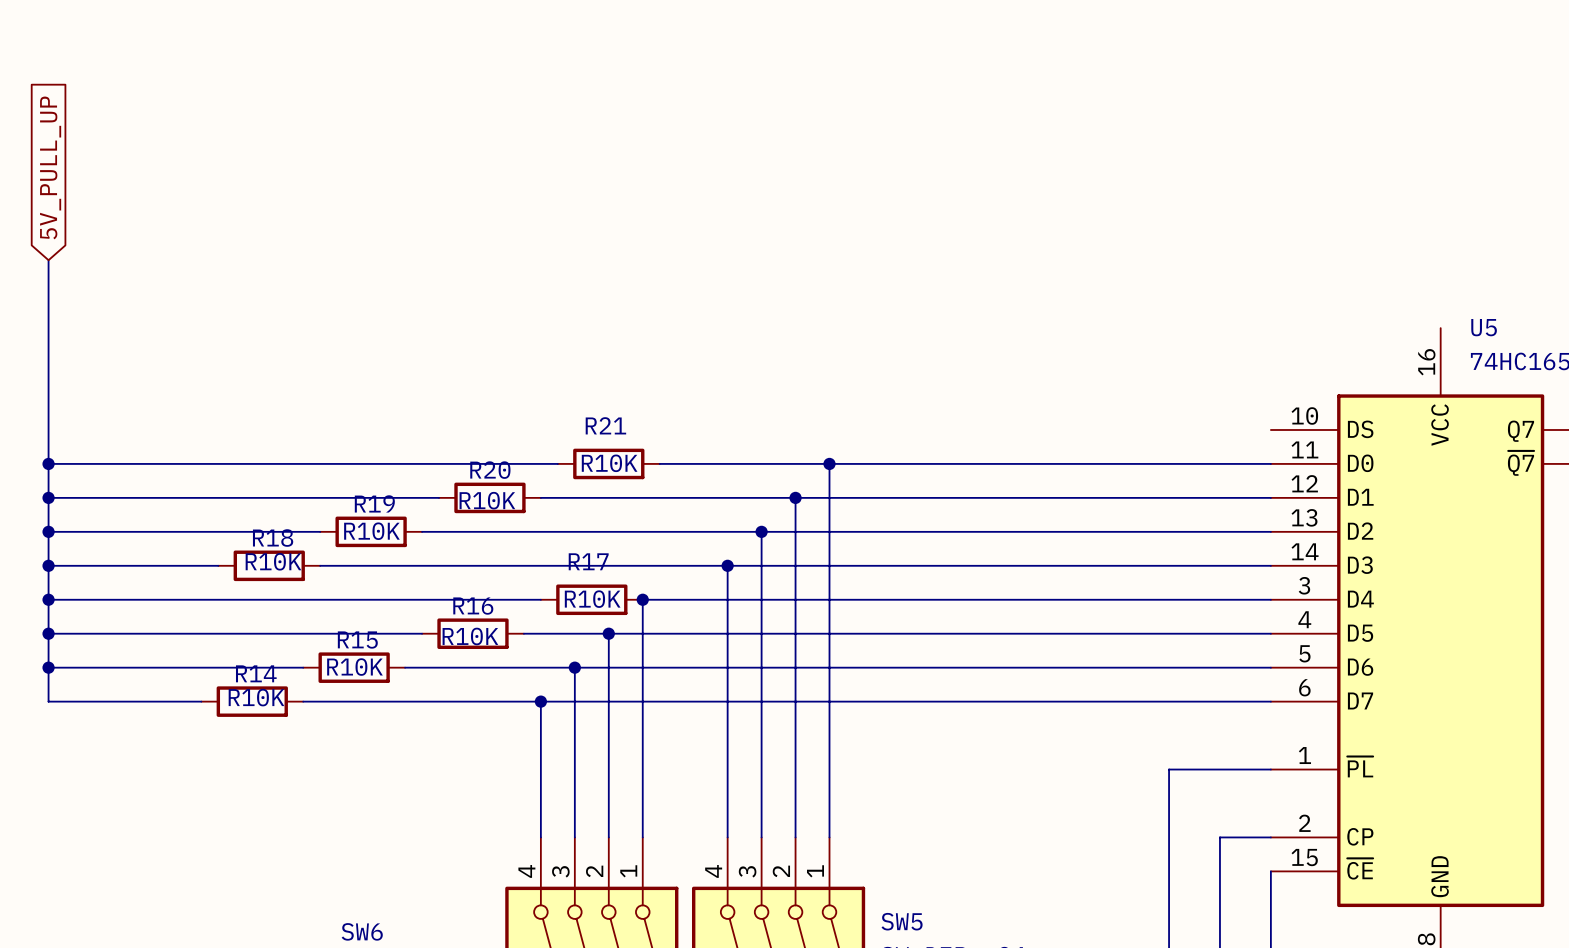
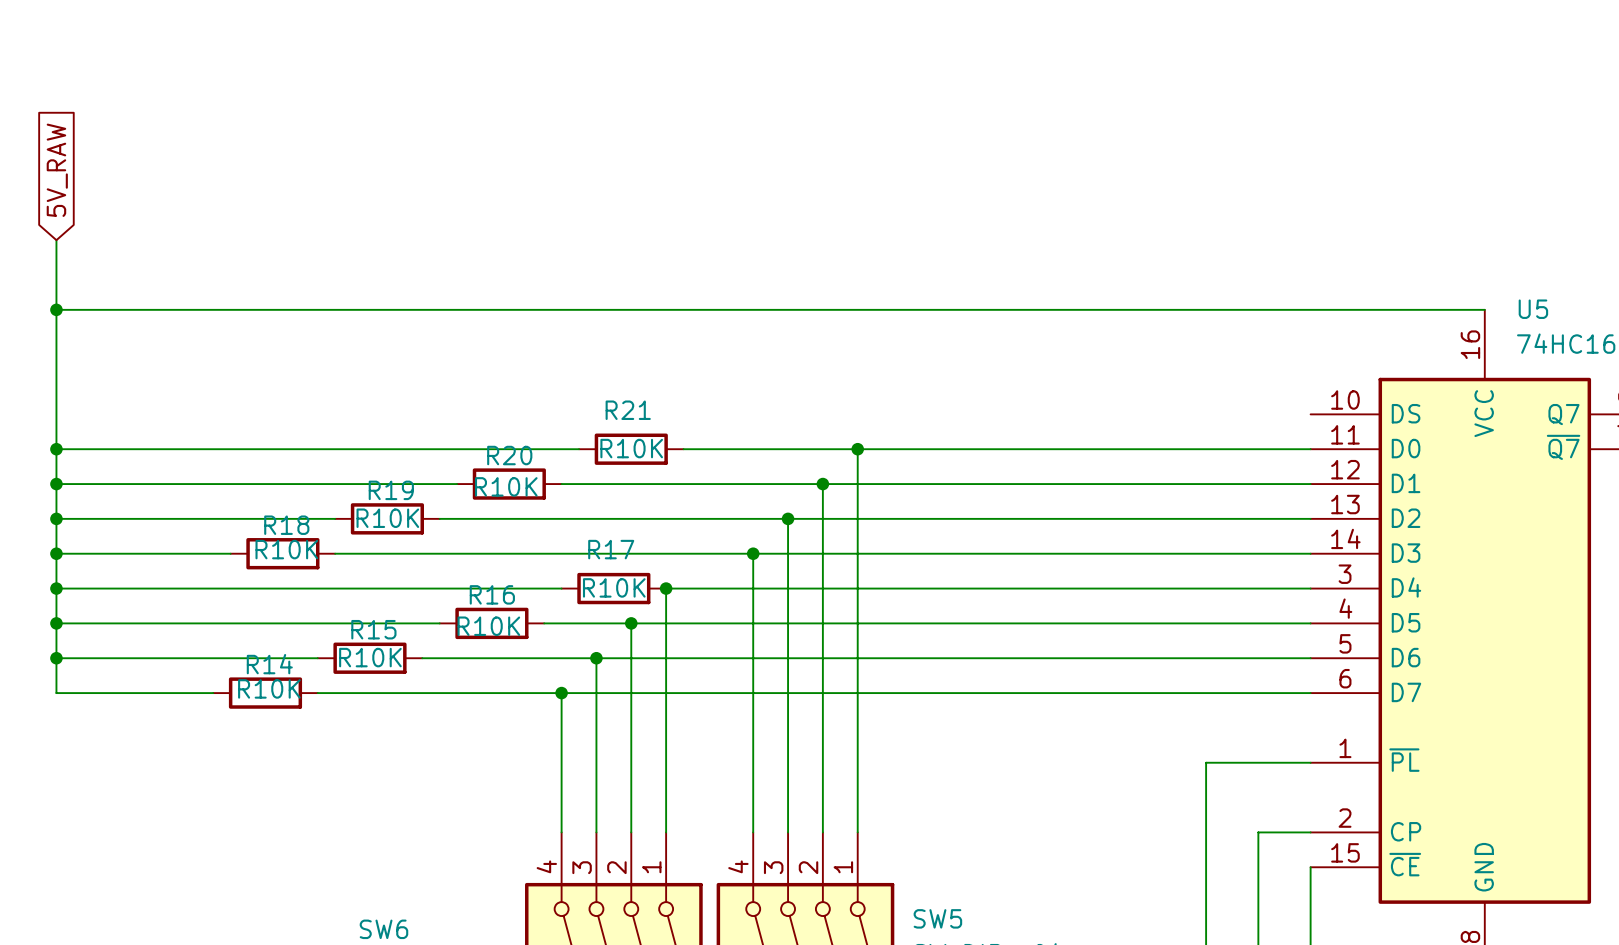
global label: 5V_PULL_UP (50, 167) -> 5V_RAW (57, 170)
wire: none -> (56, 309) (1484, 309)
junction: none -> (56, 309)

